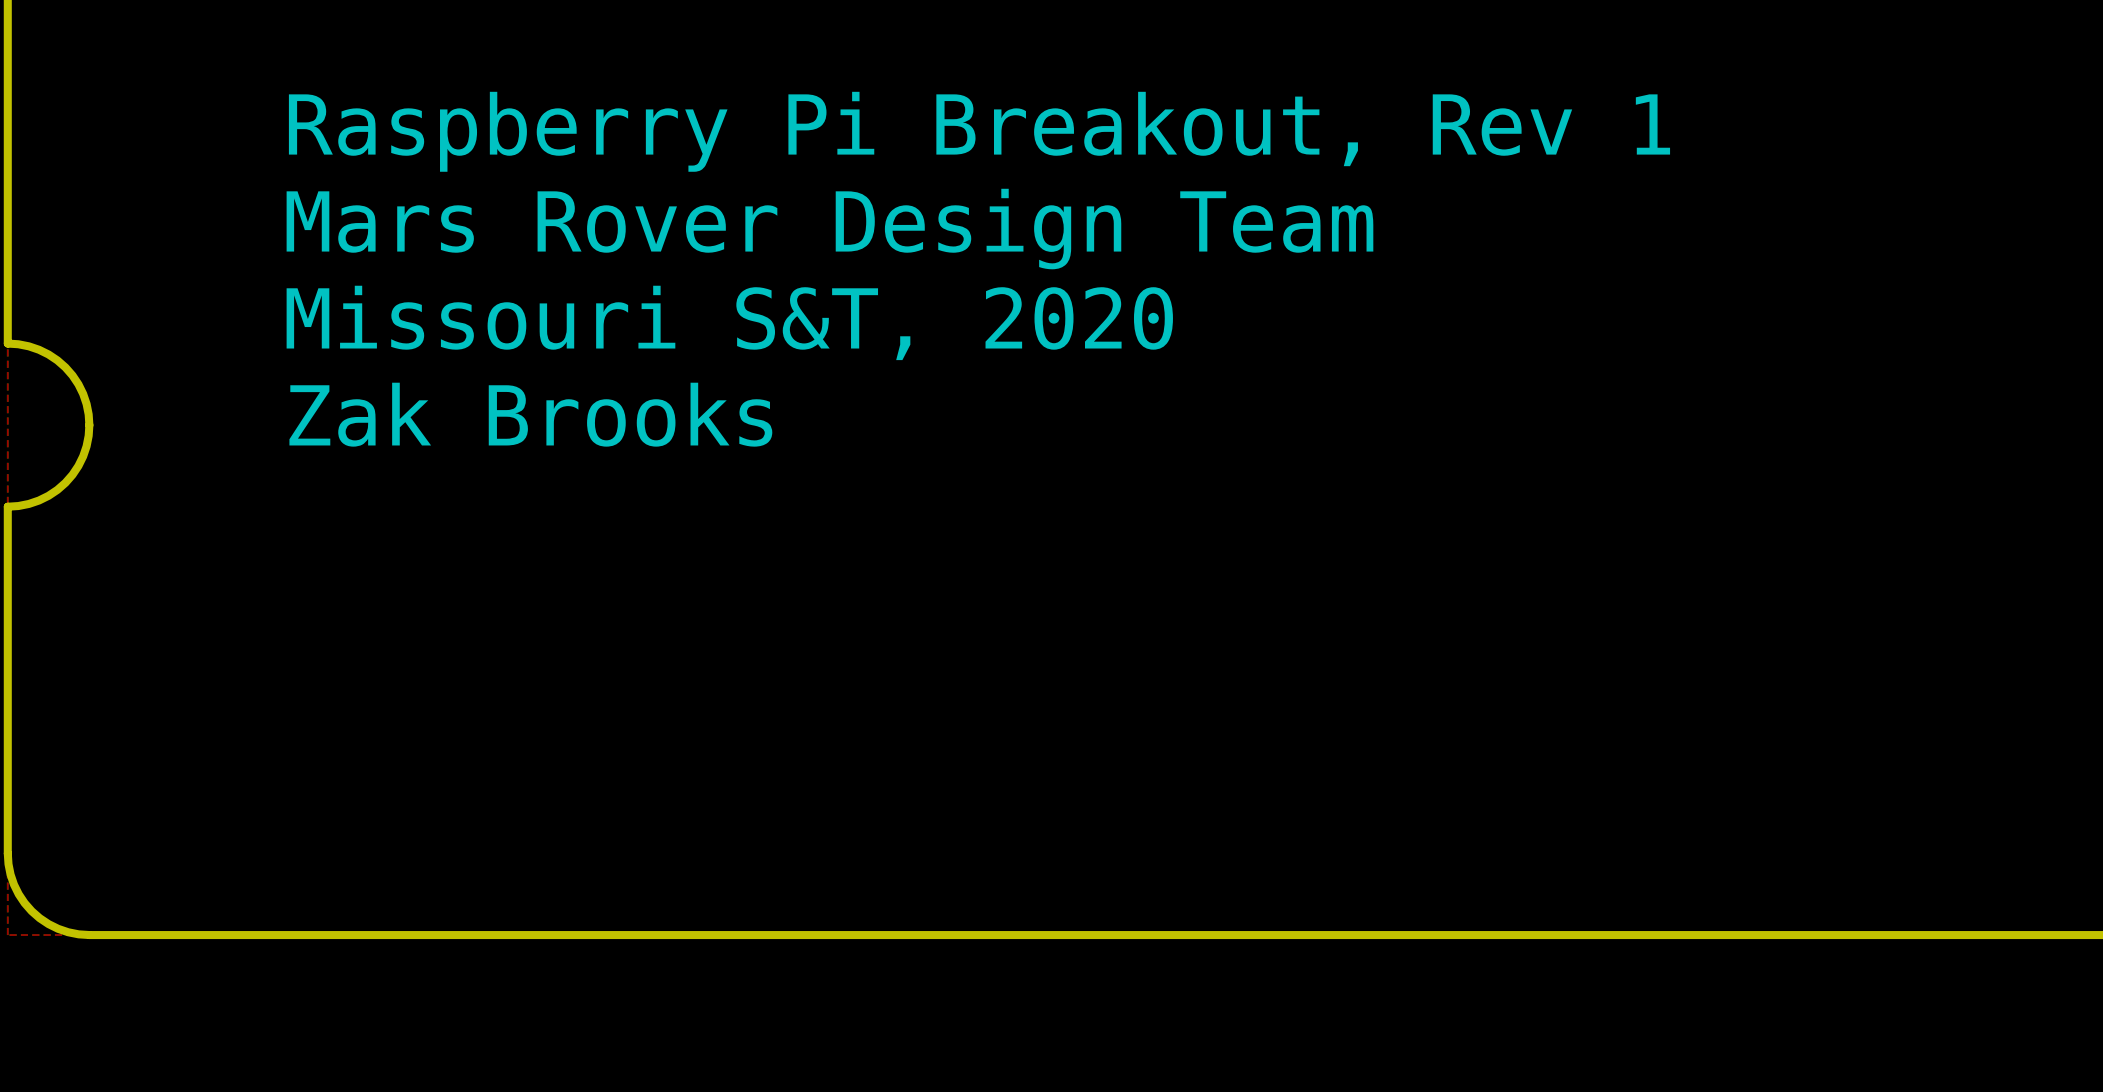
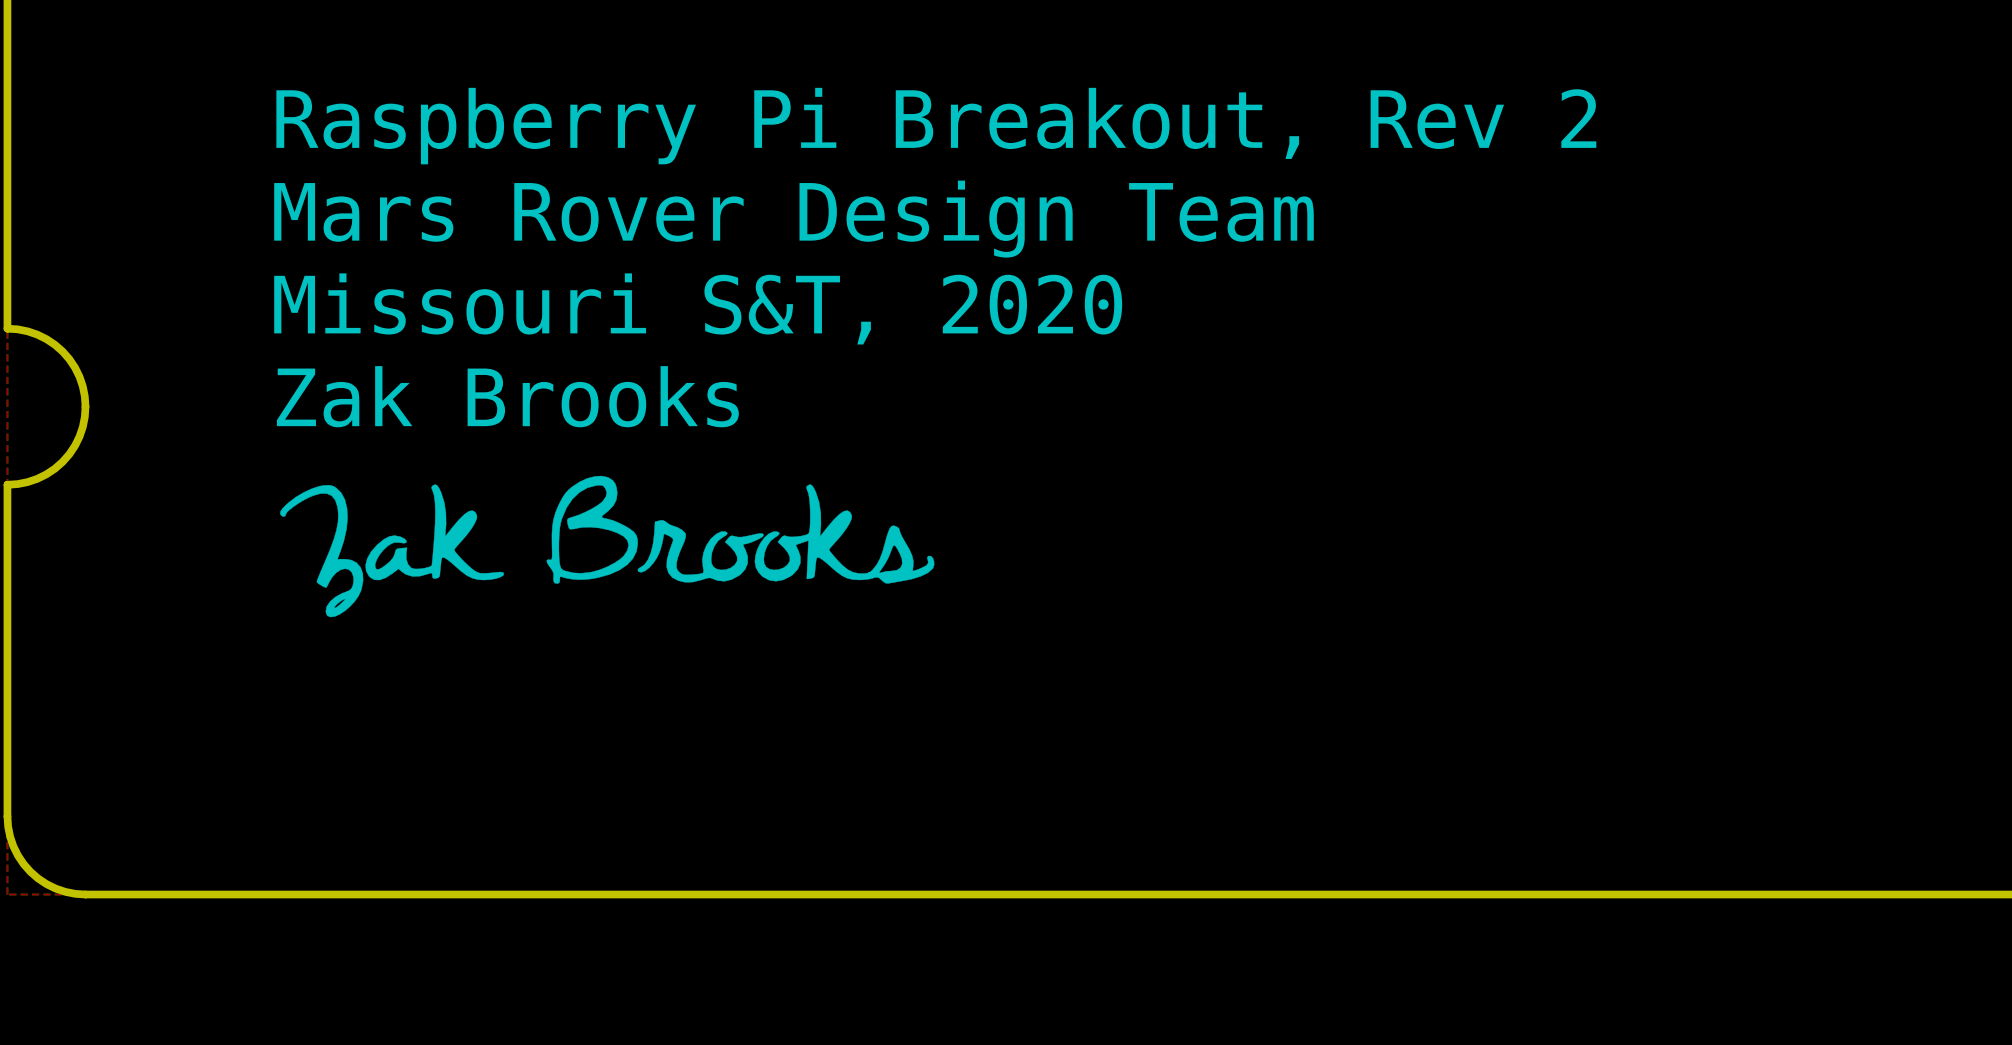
text: Raspberry Pi Breakout, Rev 1 (979, 131) -> Raspberry Pi Breakout, Rev 2 (936, 126)
drawing: none -> [279, 475, 935, 618]

